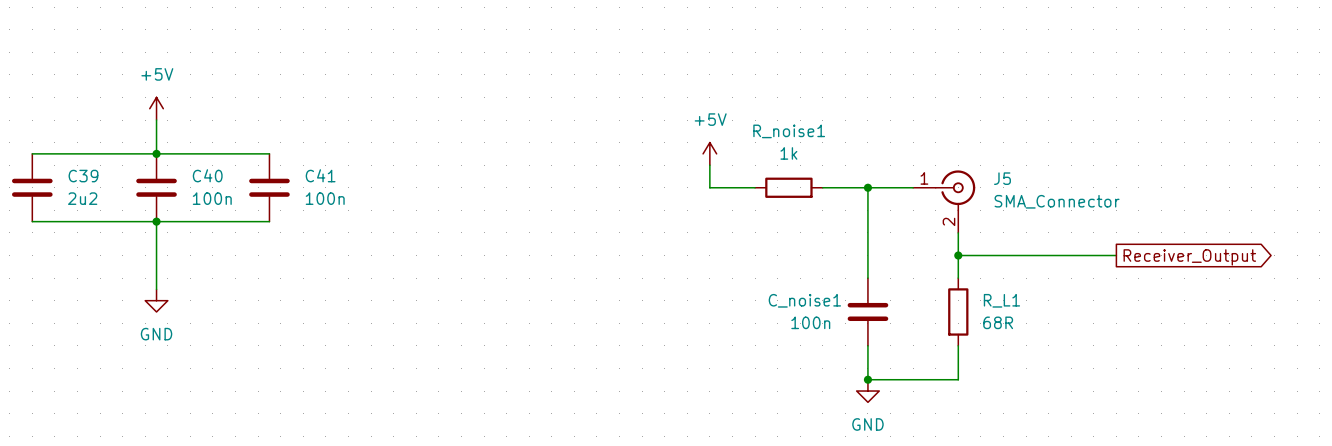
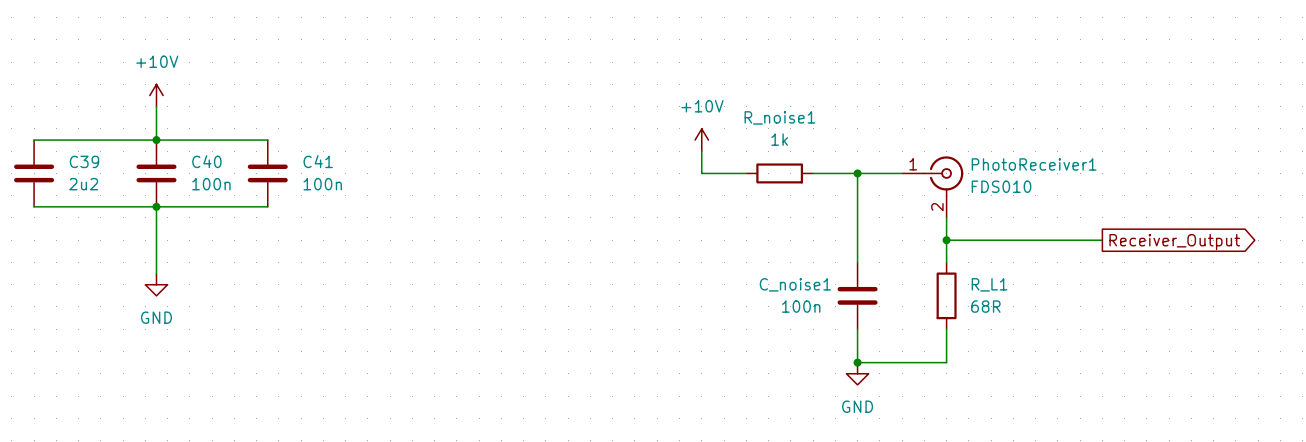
power symbol: +5V (156, 108) -> +10V (156, 95)
power symbol: +5V (709, 153) -> +10V (701, 140)
J5 name: J5 (1002, 178) -> PhotoReceiver1 (1034, 164)
J5 value: SMA_Connector (1057, 201) -> FDS010 (1001, 186)

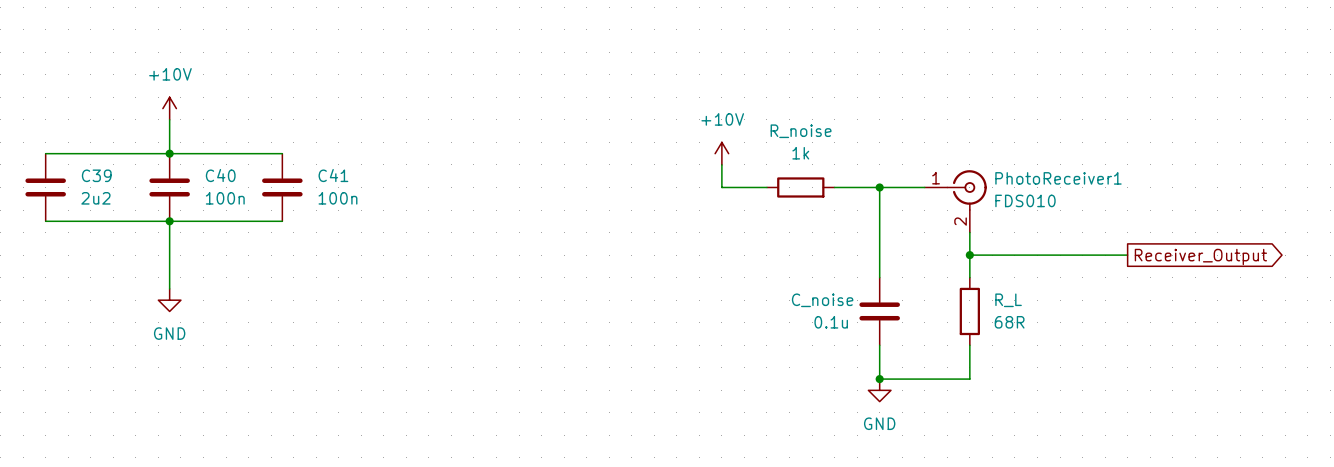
R_noise1 name: R_noise1 (779, 117) -> R_noise (801, 131)
C_noise1 name: C_noise1 (795, 284) -> C_noise (822, 300)
R_L1 name: R_L1 (989, 284) -> R_L (1008, 300)
C_noise1 value: 100n (801, 306) -> 0.1u (831, 322)

